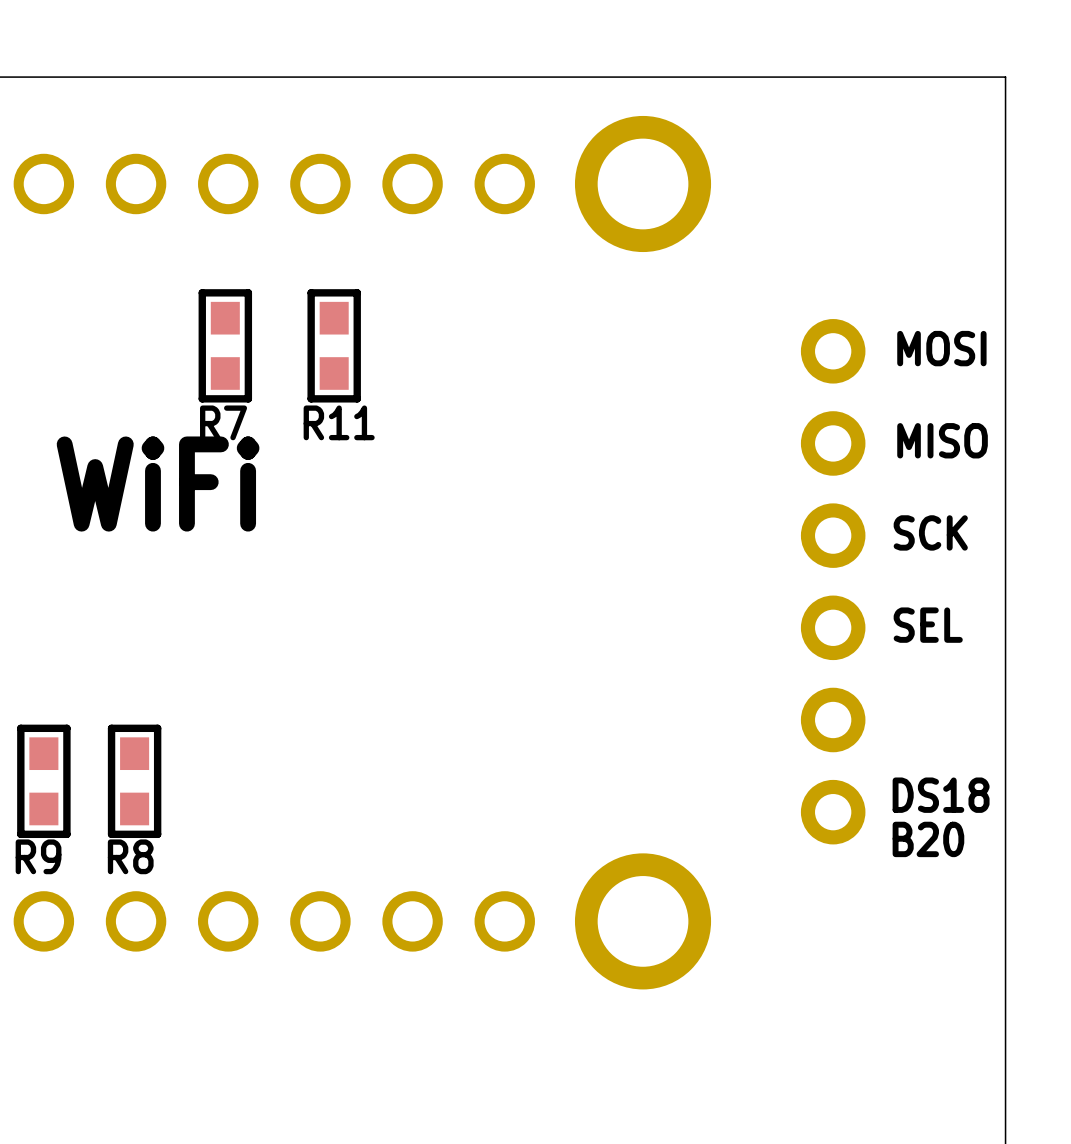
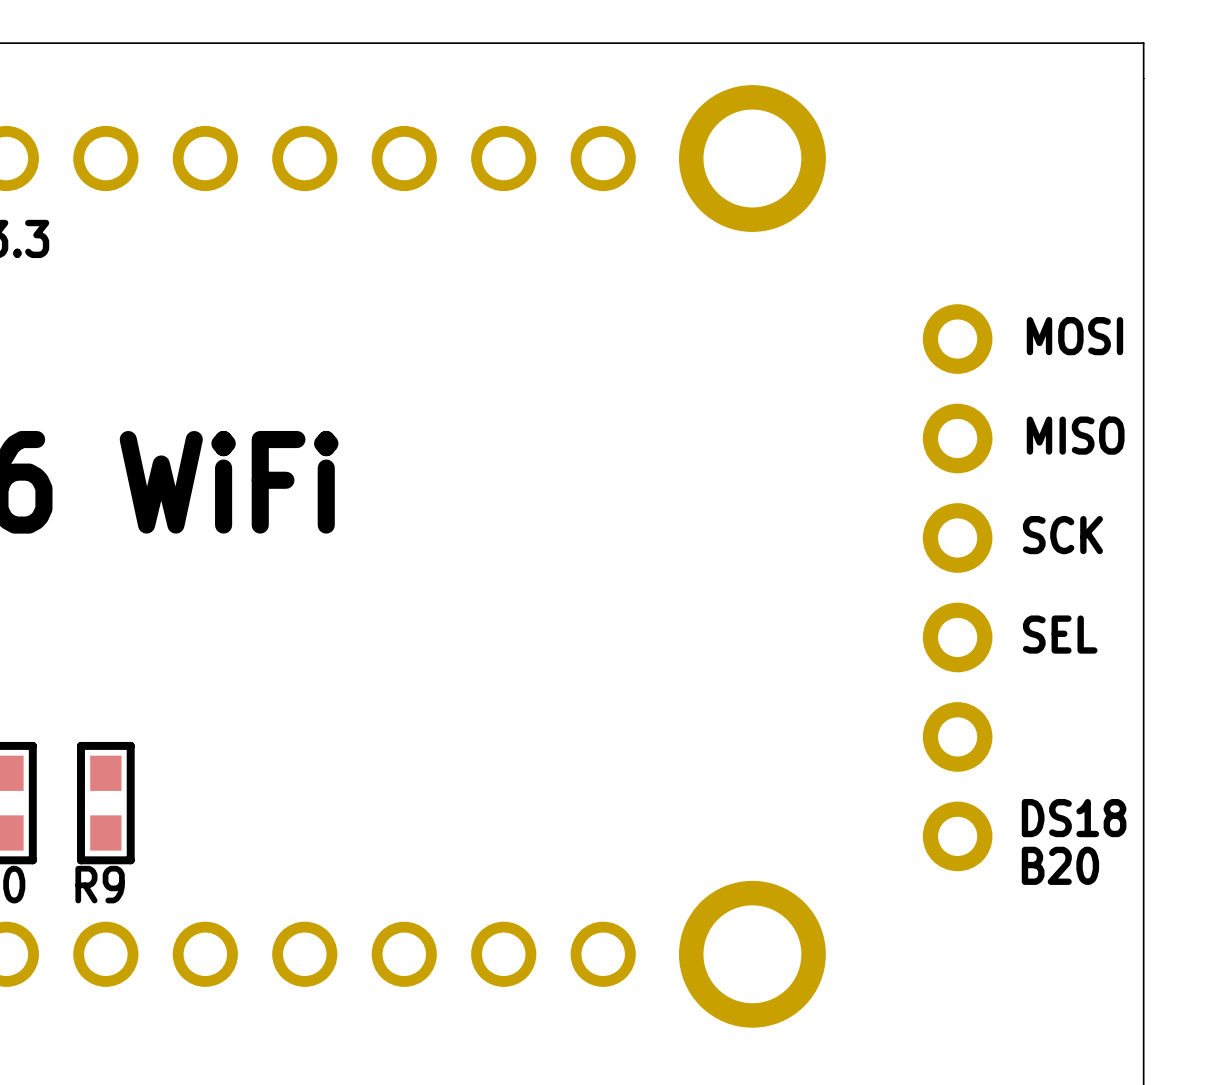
R7: (225, 345) -> none
R11: (334, 345) -> none
R8: (134, 781) -> none

